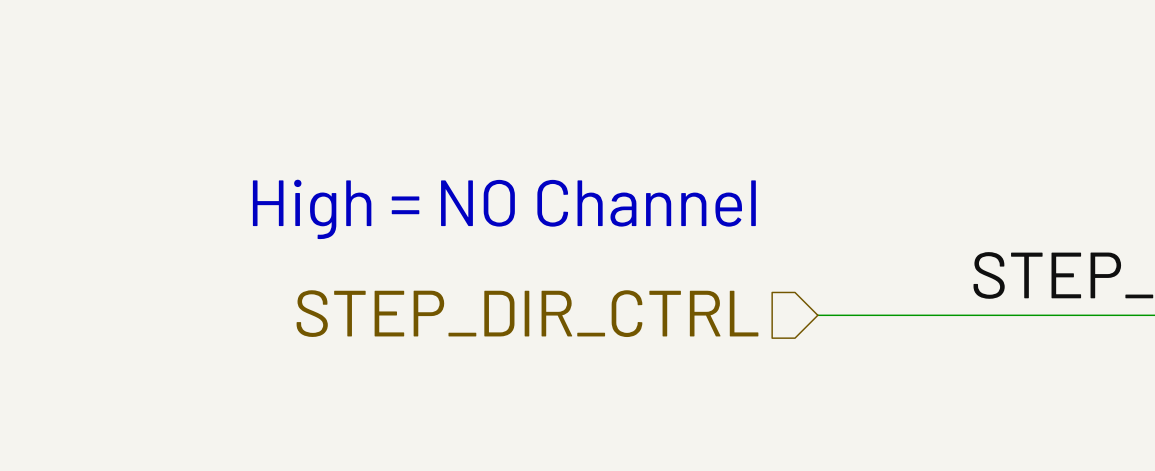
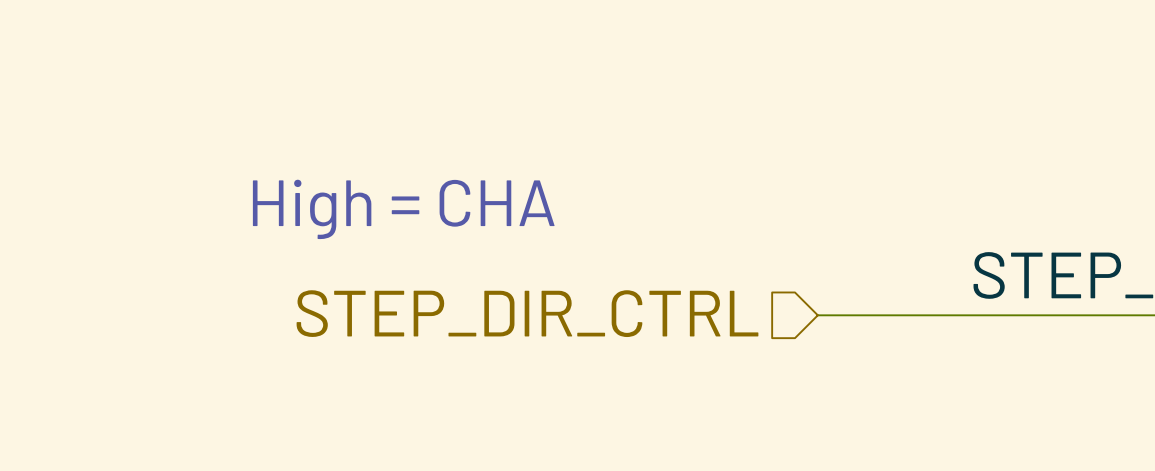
text: High = NO Channel (504, 209) -> High = CHA (403, 209)

